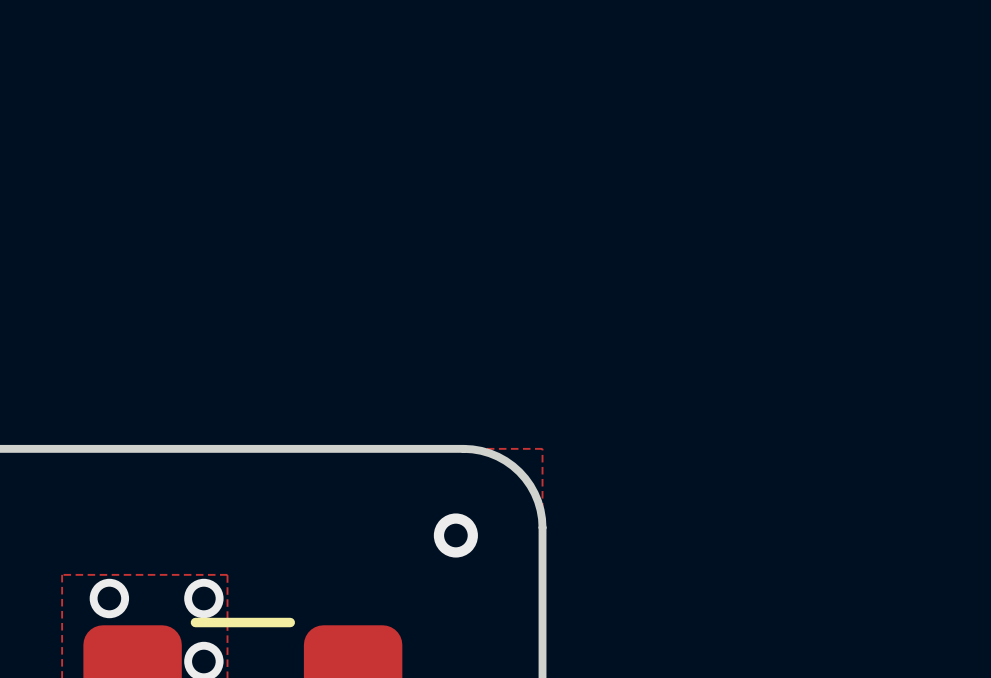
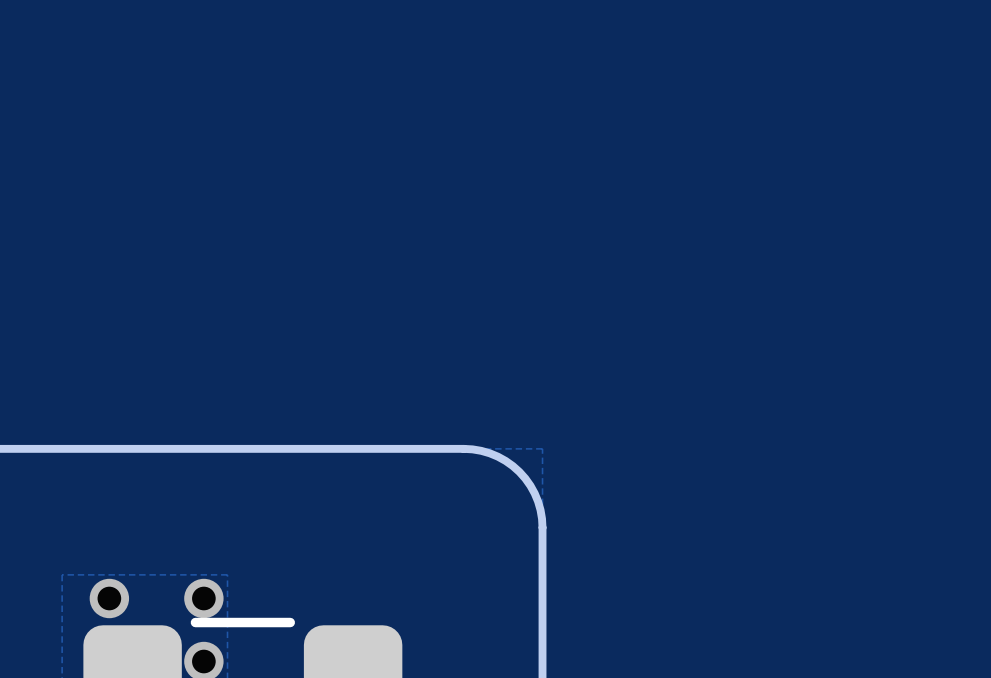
via: (455, 535) -> none

